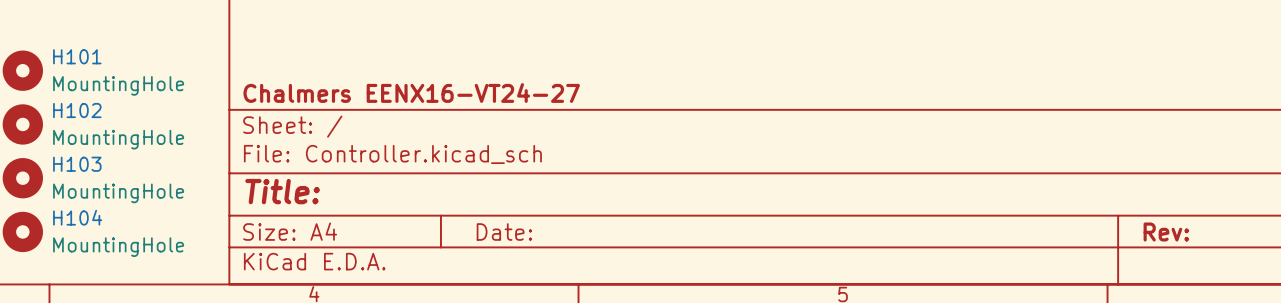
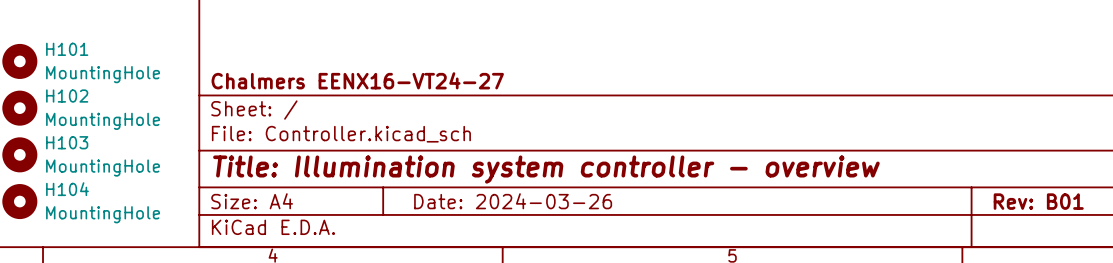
title block: Title: (282, 191) -> Title: Illumination system controller - overview (546, 169)
title block: Date: (504, 232) -> Date: 2024-03-26 (513, 201)
title block: Rev: (1166, 232) -> Rev: B01 (1038, 201)

